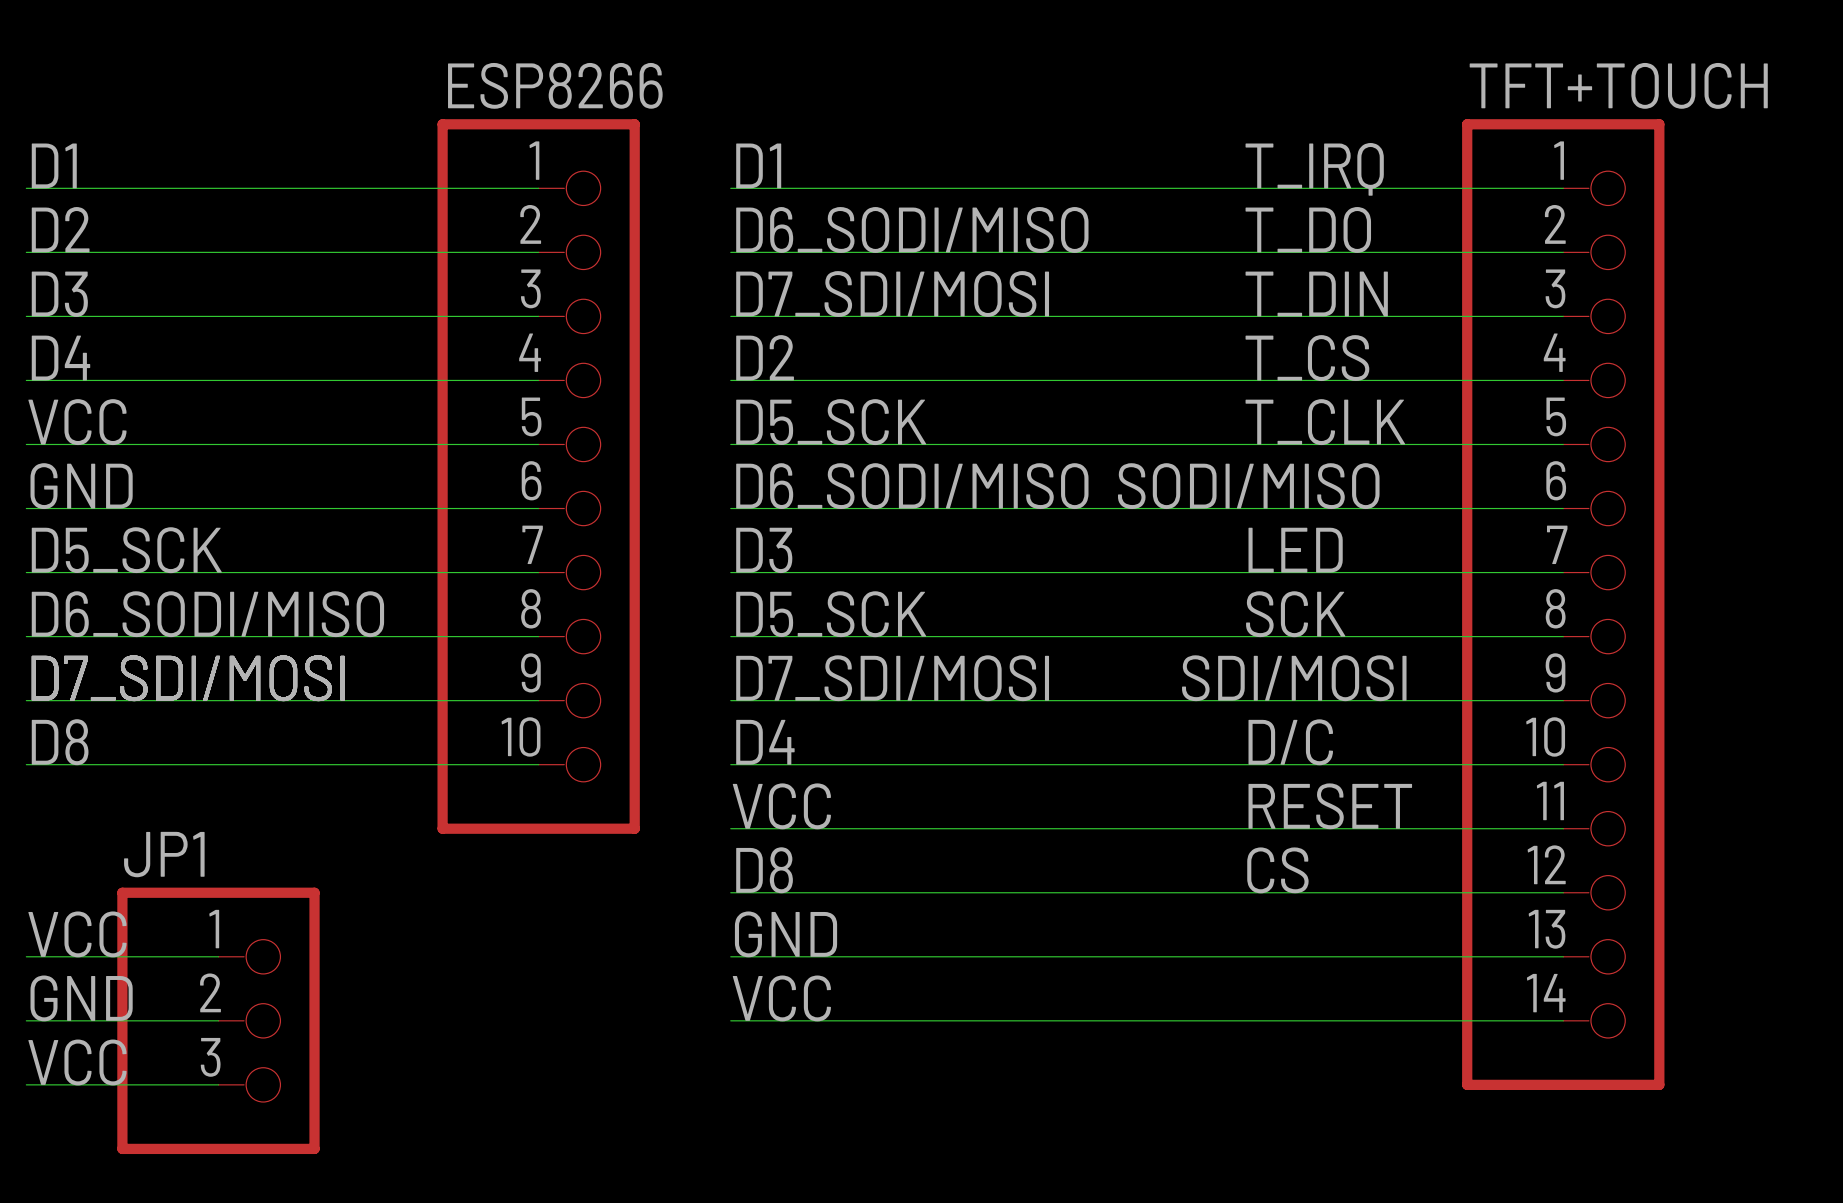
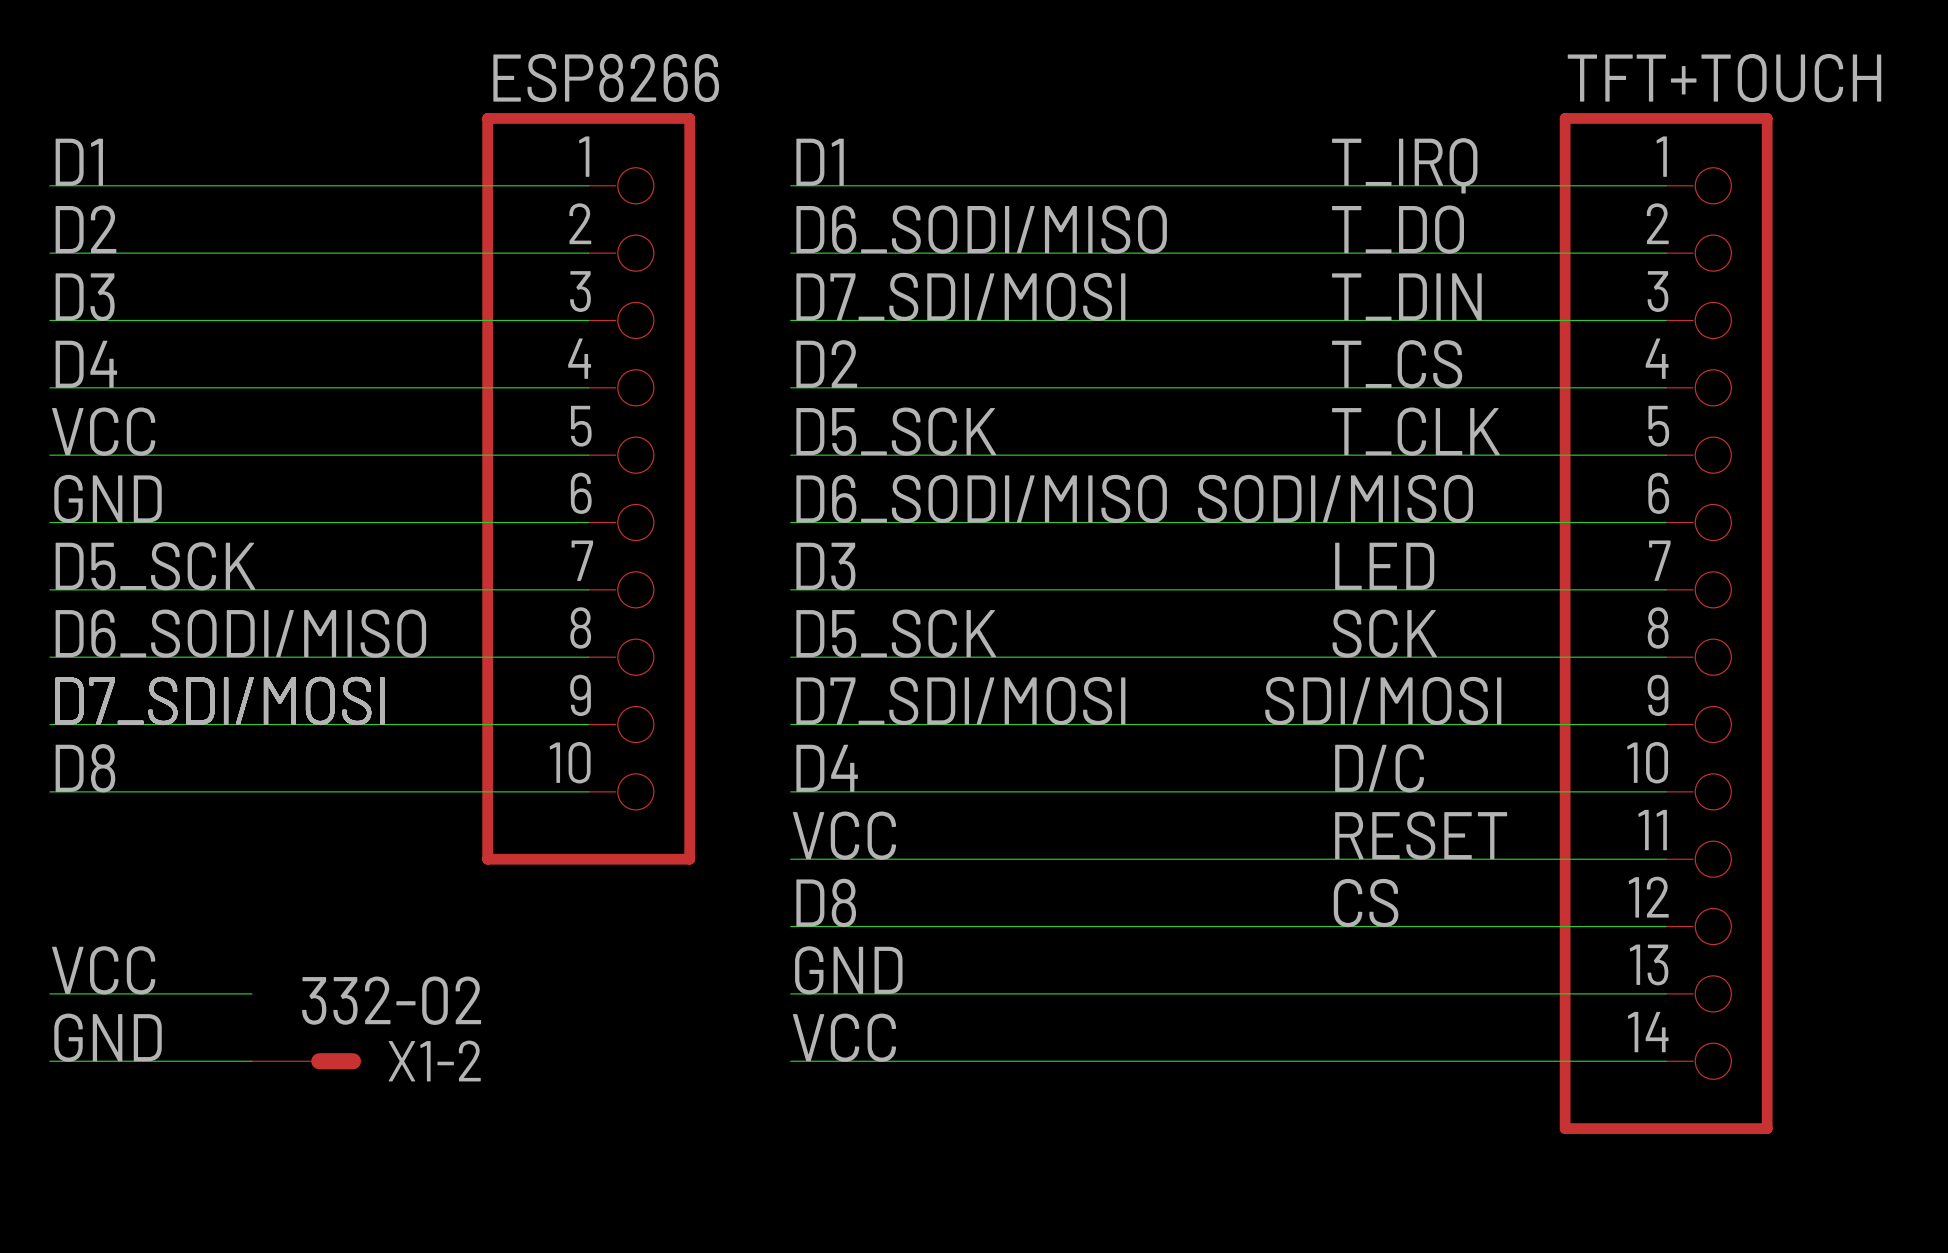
JP1: (218, 1020) -> none
X1-2: none -> 332-02 (306, 1061)
label: VCC (77, 1062) -> none
wire: (26, 1084) (218, 1084) -> none

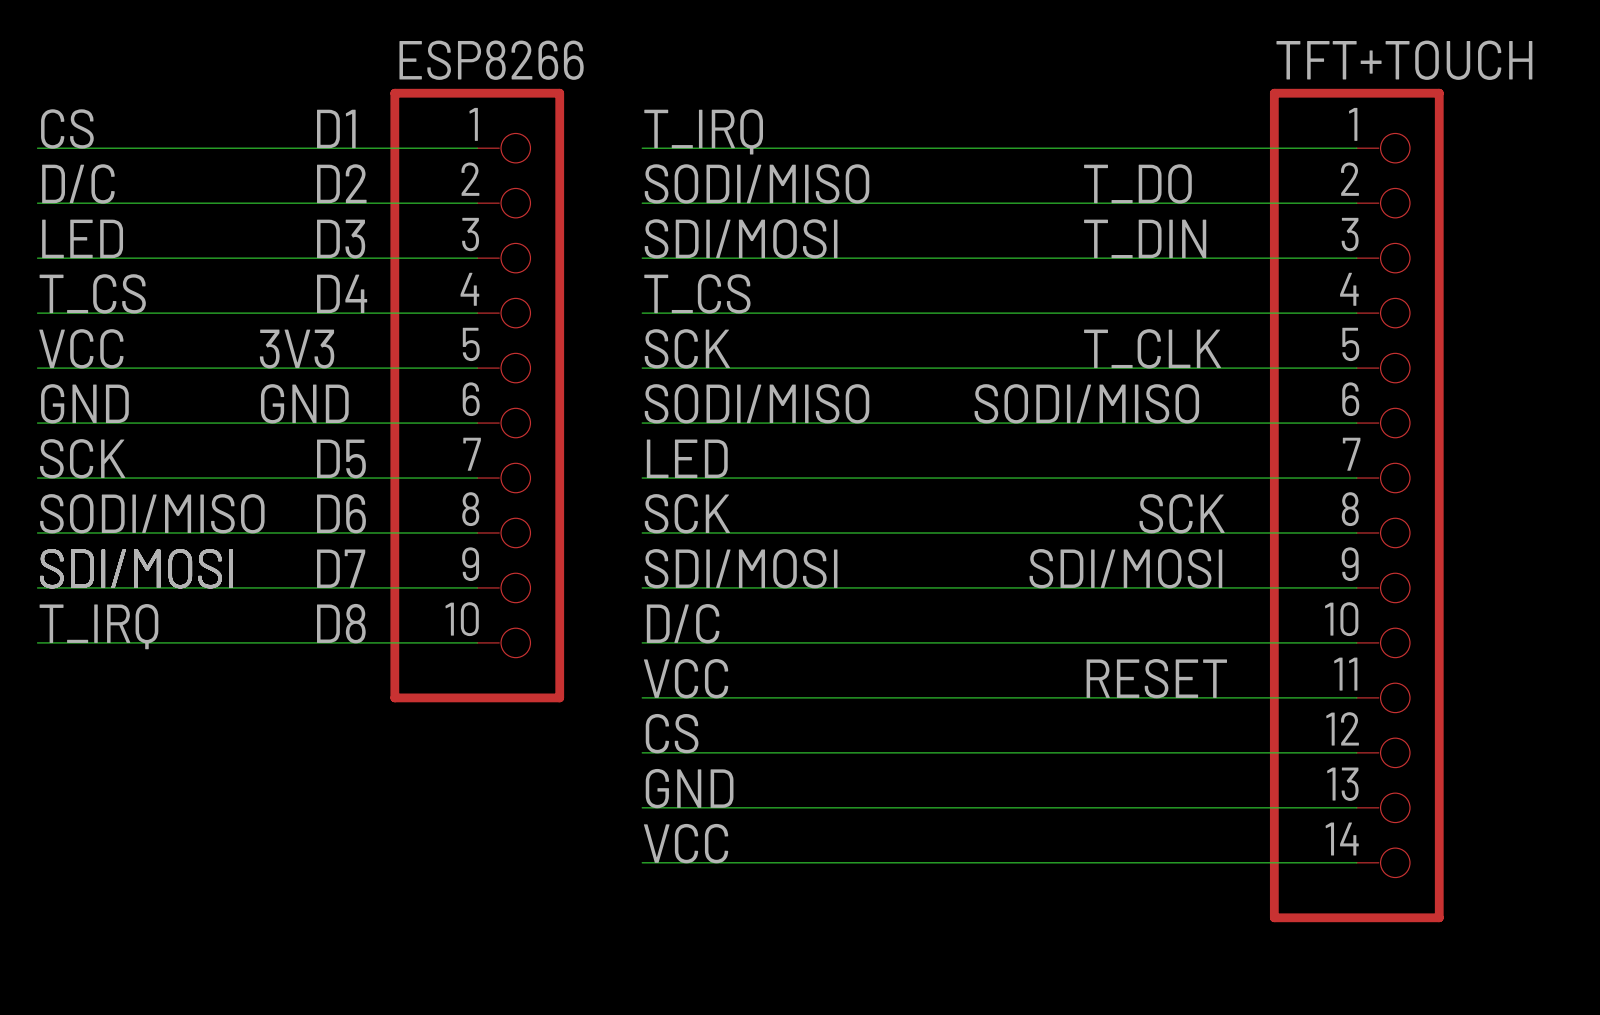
label: D1 (79, 162) -> CS (67, 128)
text: none -> D1 (336, 128)
label: D1 (820, 162) -> T_IRQ (703, 131)
text: T_IRQ (1404, 165) -> none
label: D2 (85, 229) -> D/C (78, 183)
text: none -> D2 (341, 183)
label: D6_SODI/MISO (981, 229) -> SODI/MISO (757, 183)
label: D7_SDI/MOSI (960, 296) -> SDI/MOSI (741, 238)
label: D3 (85, 297) -> LED (82, 238)
text: none -> D3 (341, 239)
label: D2 (826, 363) -> T_CS (697, 293)
label: D4 (86, 364) -> T_CS (92, 293)
text: none -> D4 (342, 293)
text: T_CS (1397, 364) -> none
text: none -> 3V3 (297, 349)
label: D5_SCK (896, 431) -> SCK (687, 348)
text: none -> GND (304, 403)
label: D6_SODI/MISO (981, 498) -> SODI/MISO (757, 403)
label: D5_SCK (155, 566) -> SCK (82, 458)
text: none -> D5 (341, 458)
label: D3 (825, 566) -> LED (687, 458)
text: LED (1384, 566) -> none
label: D6_SODI/MISO (240, 633) -> SODI/MISO (152, 513)
text: none -> D6 (341, 513)
label: D5_SCK (896, 633) -> SCK (687, 513)
text position: SCK (1384, 633) -> SCK (1182, 513)
label: D7_SDI/MOSI (220, 700) -> SDI/MOSI (136, 568)
text: none -> D7 (341, 568)
label: D7_SDI/MOSI (960, 700) -> SDI/MOSI (741, 568)
label: D8 (85, 768) -> T_IRQ (98, 626)
text: none -> D8 (341, 623)
label: D4 (827, 768) -> D/C (683, 623)
text: D/C (1379, 768) -> none
label: D8 (826, 902) -> CS (672, 733)
text: CS (1366, 903) -> none
label: VCC (103, 970) -> none
wire: (49, 993) (251, 993) -> none
label: GND (108, 1037) -> none
wire: (49, 1061) (251, 1061) -> none
X1-2: 332-02 (306, 1061) -> none

